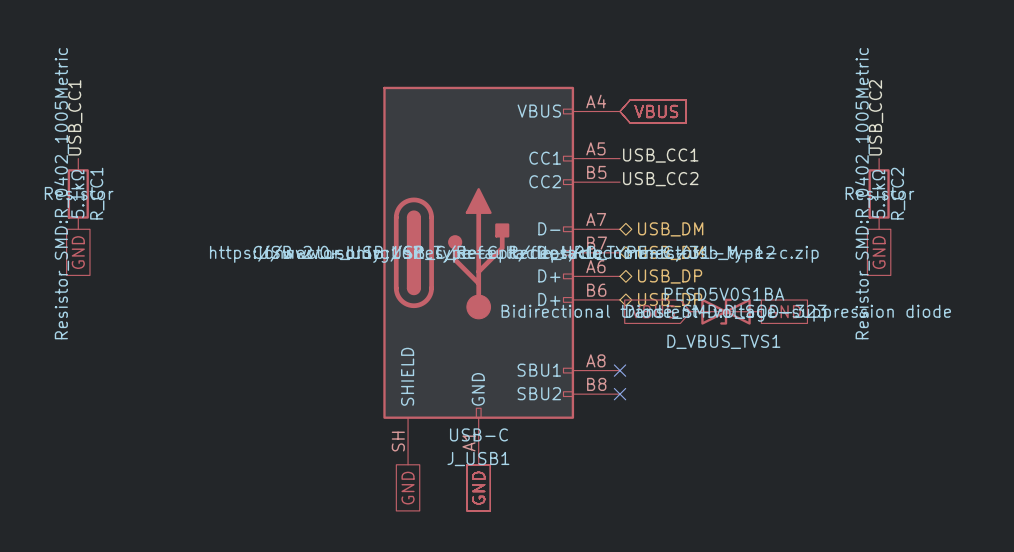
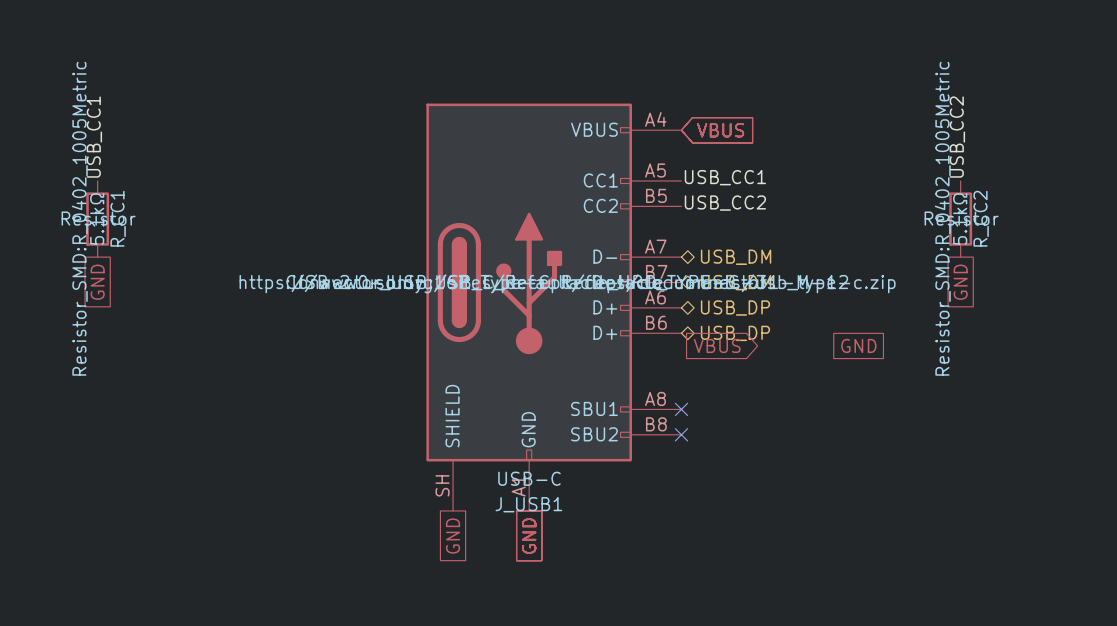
D_VBUS_TVS1: PESD5V0S1BA (726, 311) -> none

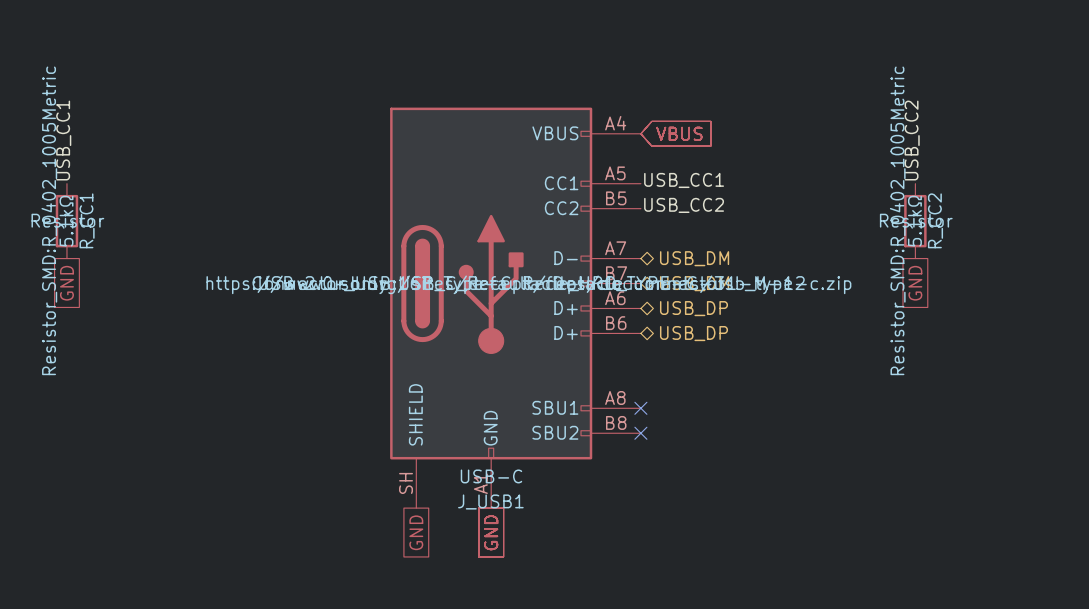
global label: VBUS (717, 345) -> none
global label: GND (858, 345) -> none

